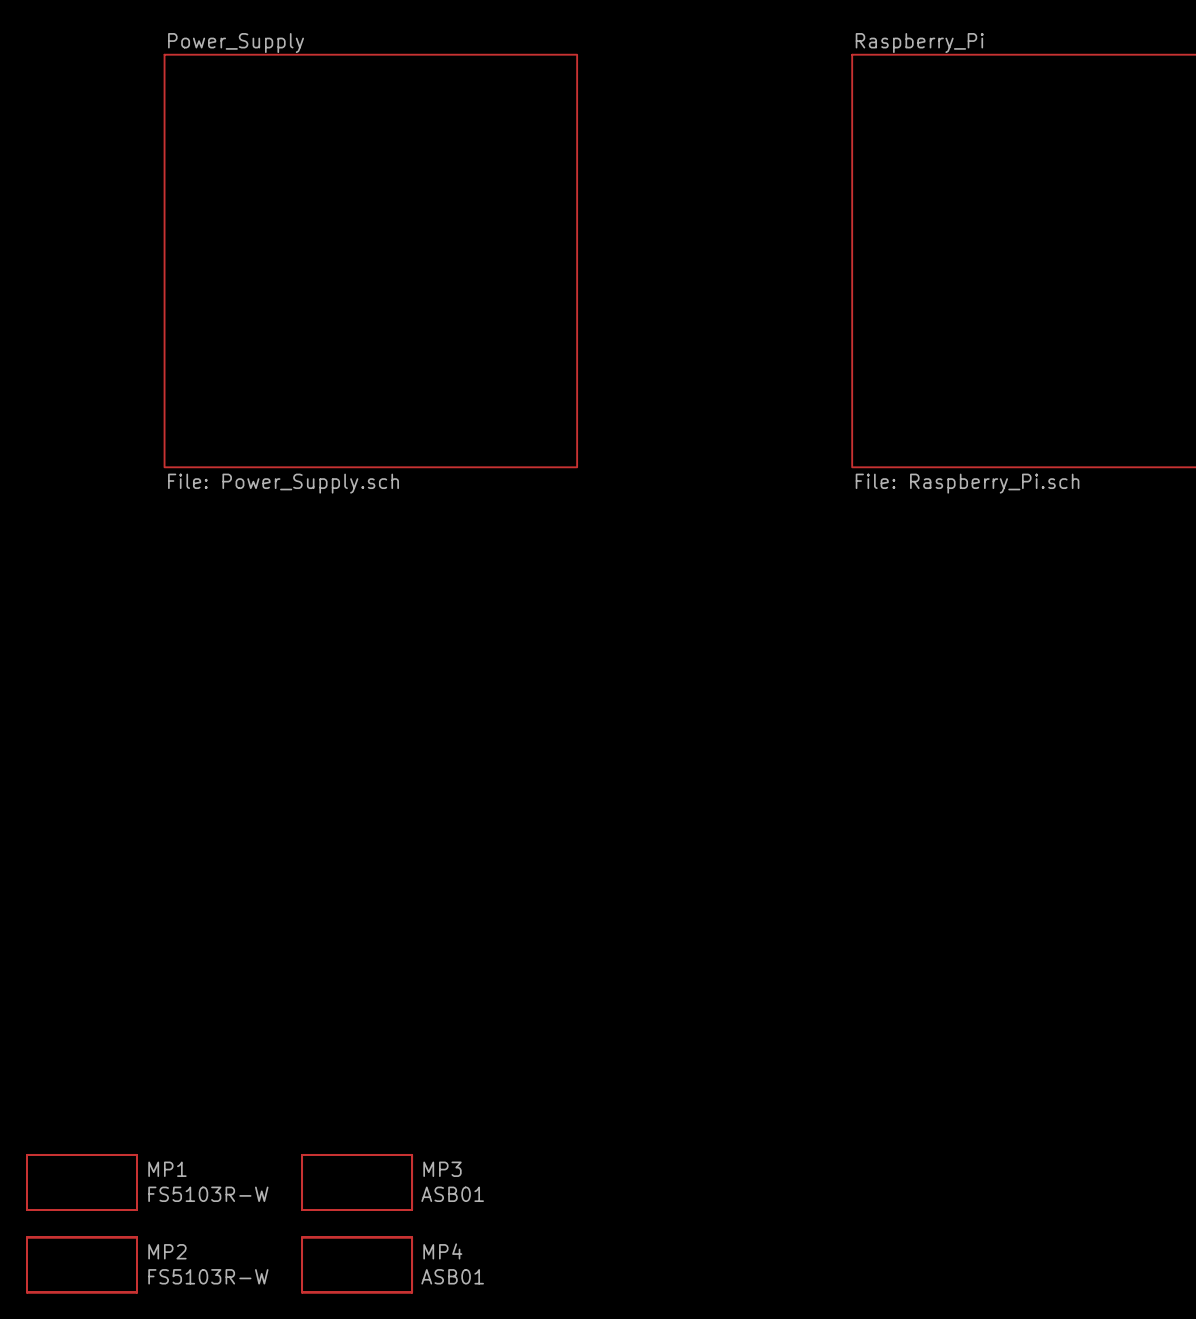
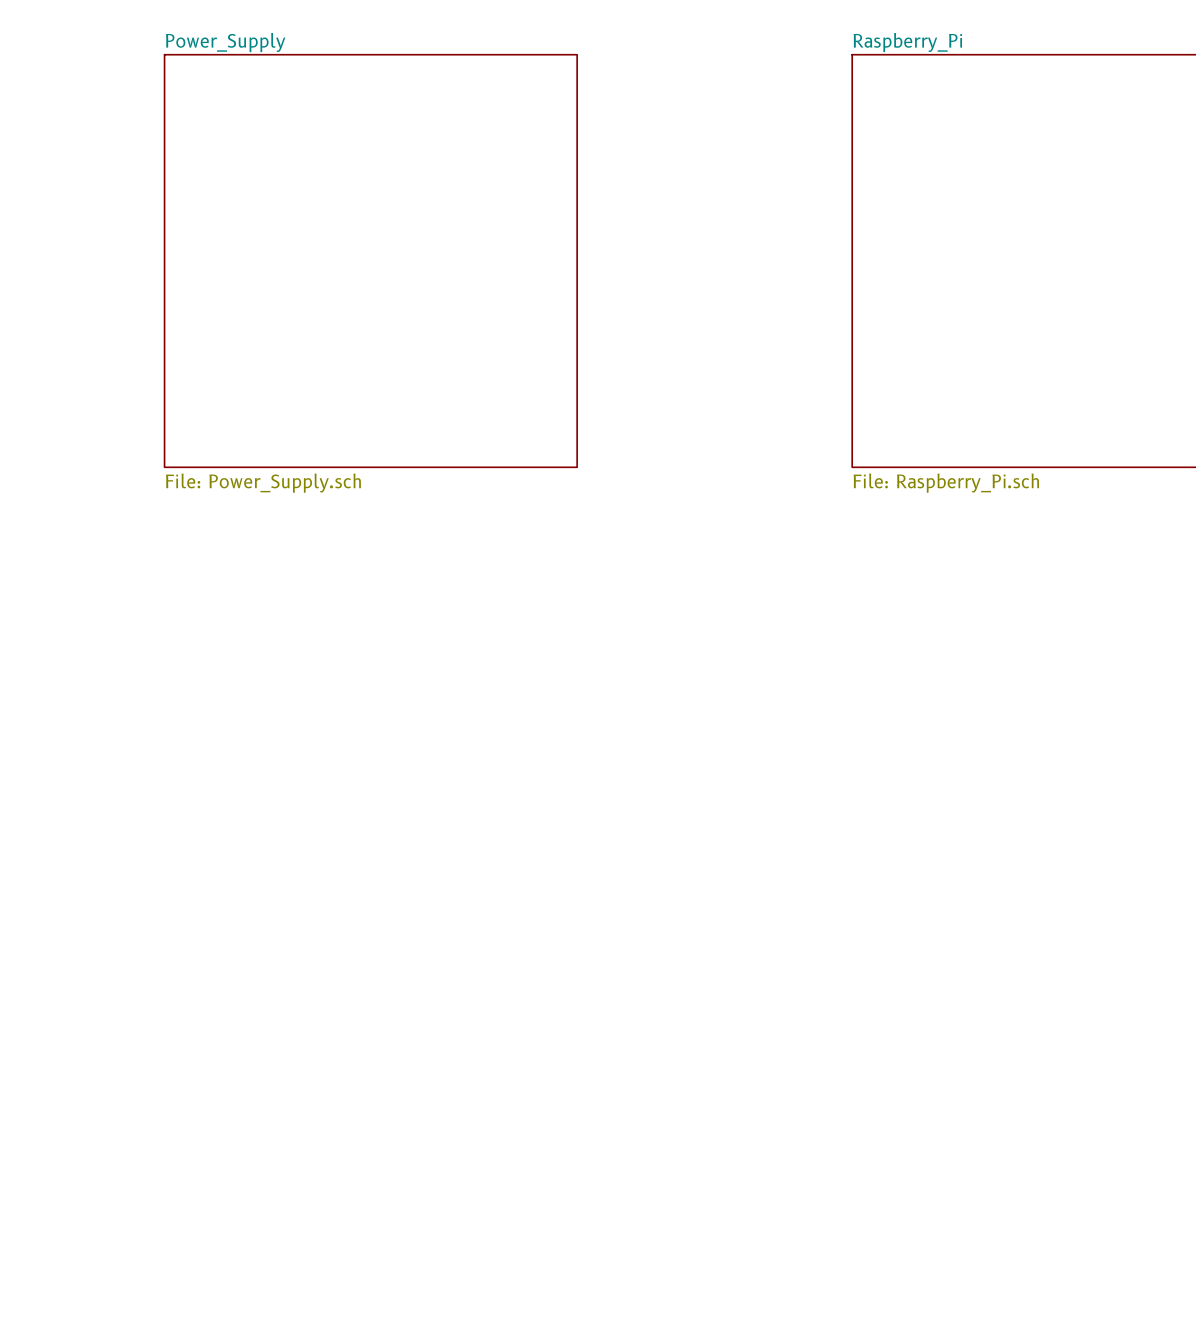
MP1: FS5103R-W (82, 1182) -> none
MP3: ASB01 (357, 1182) -> none
MP2: FS5103R-W (82, 1264) -> none
MP4: ASB01 (357, 1264) -> none

